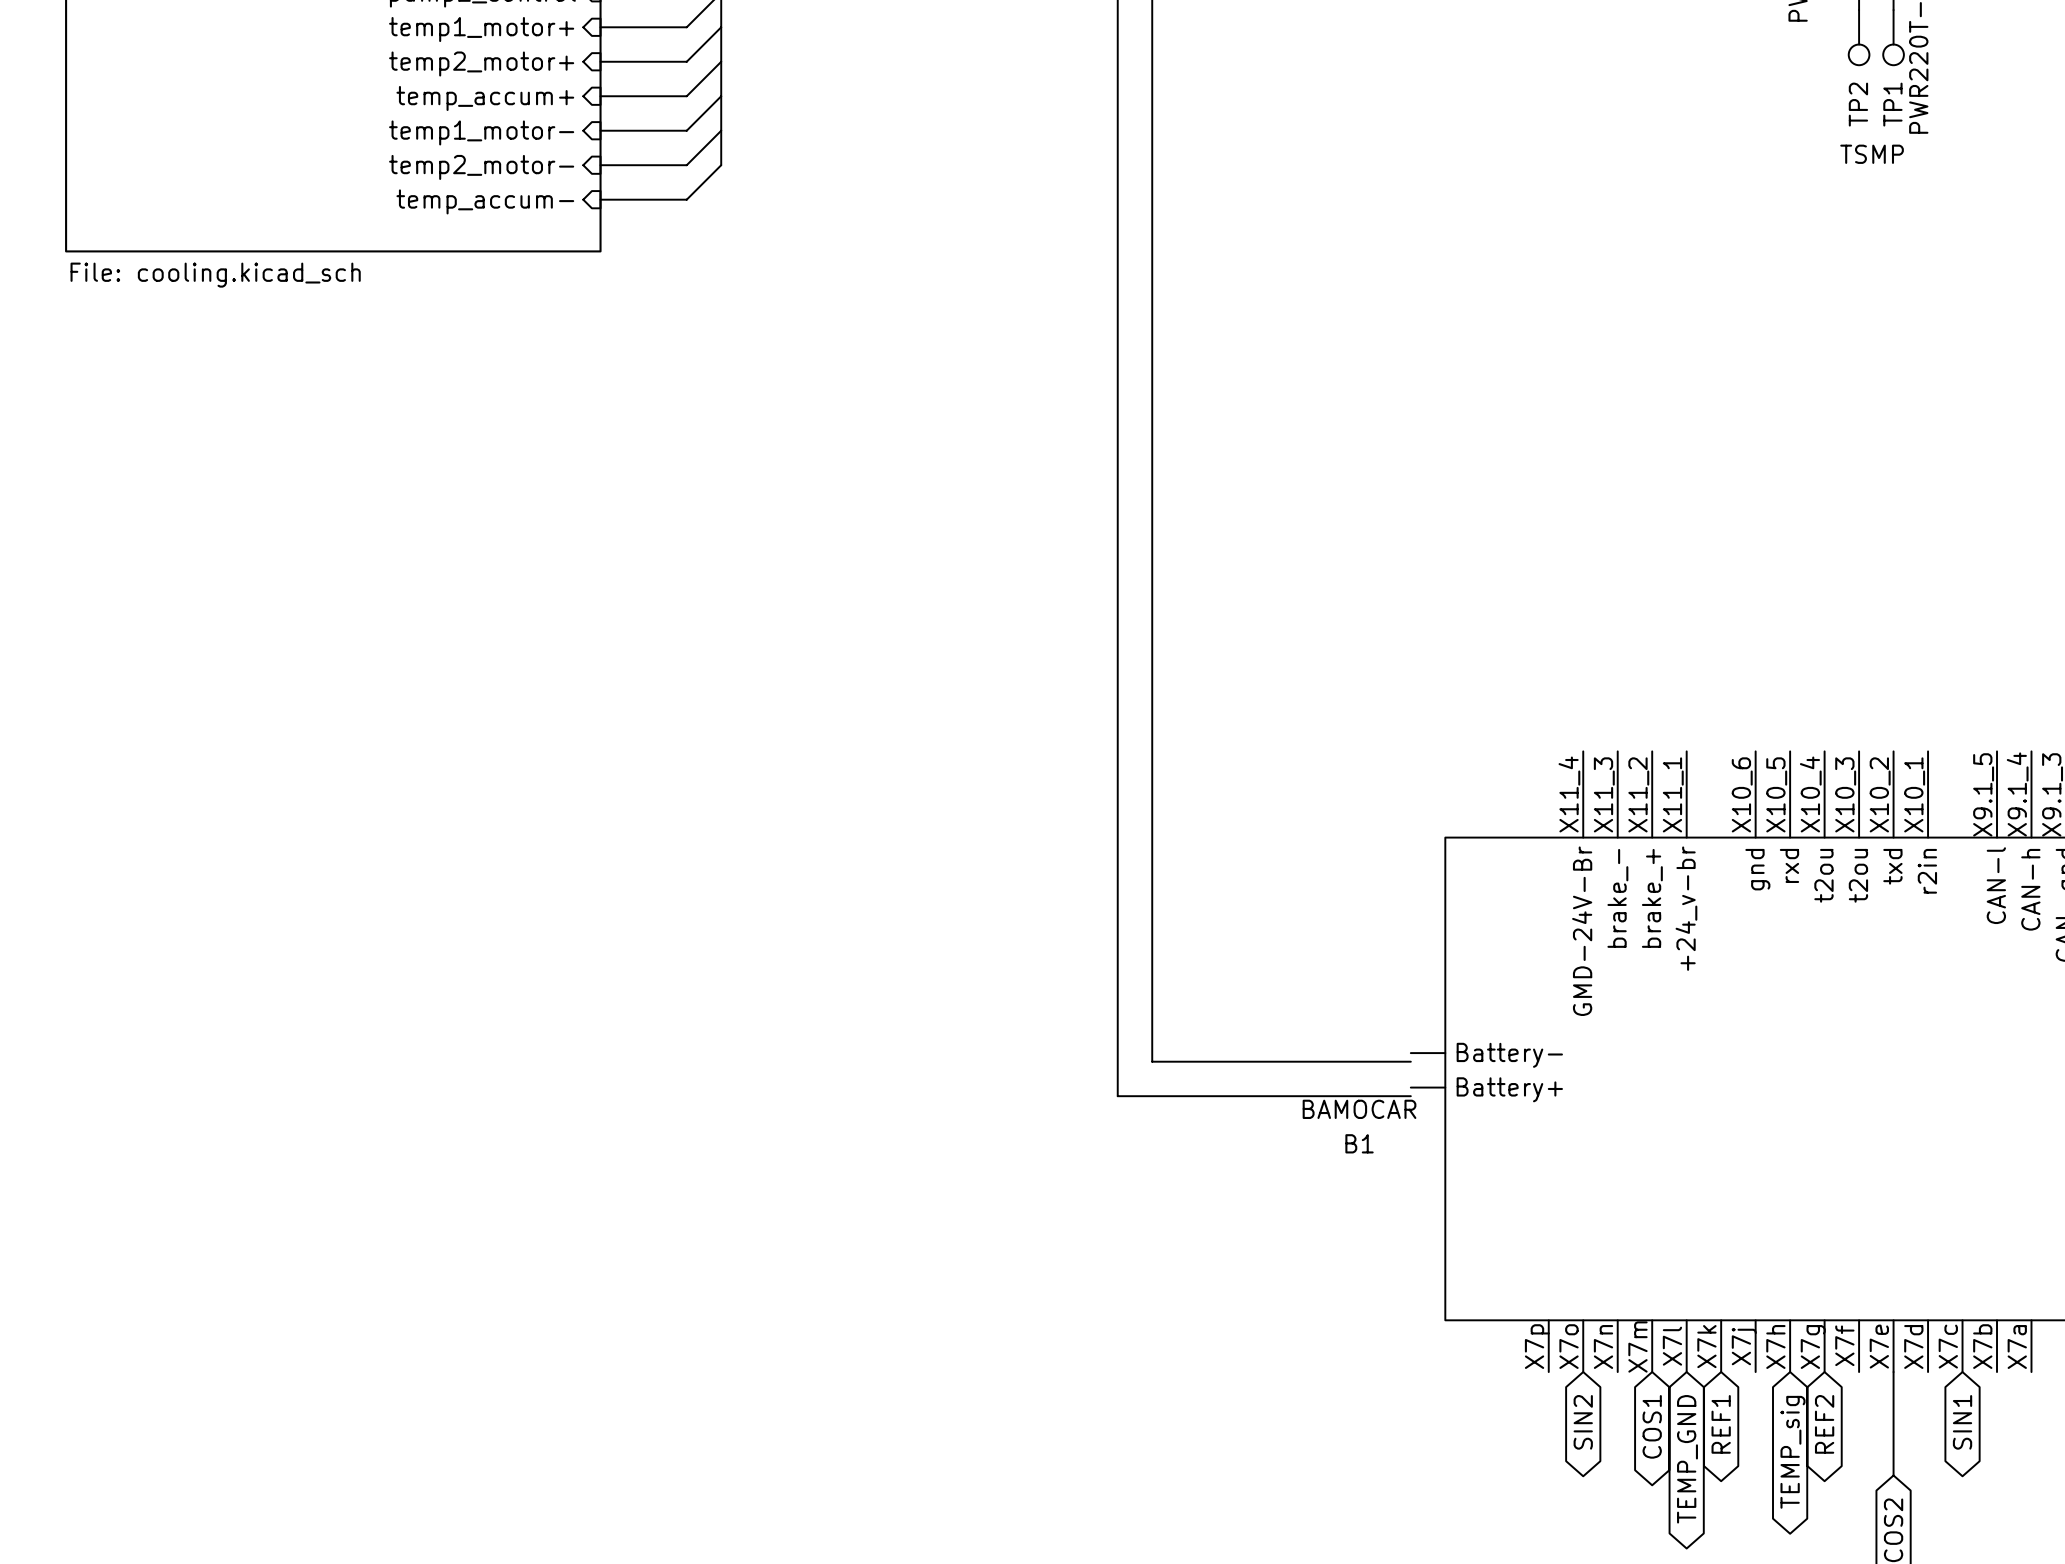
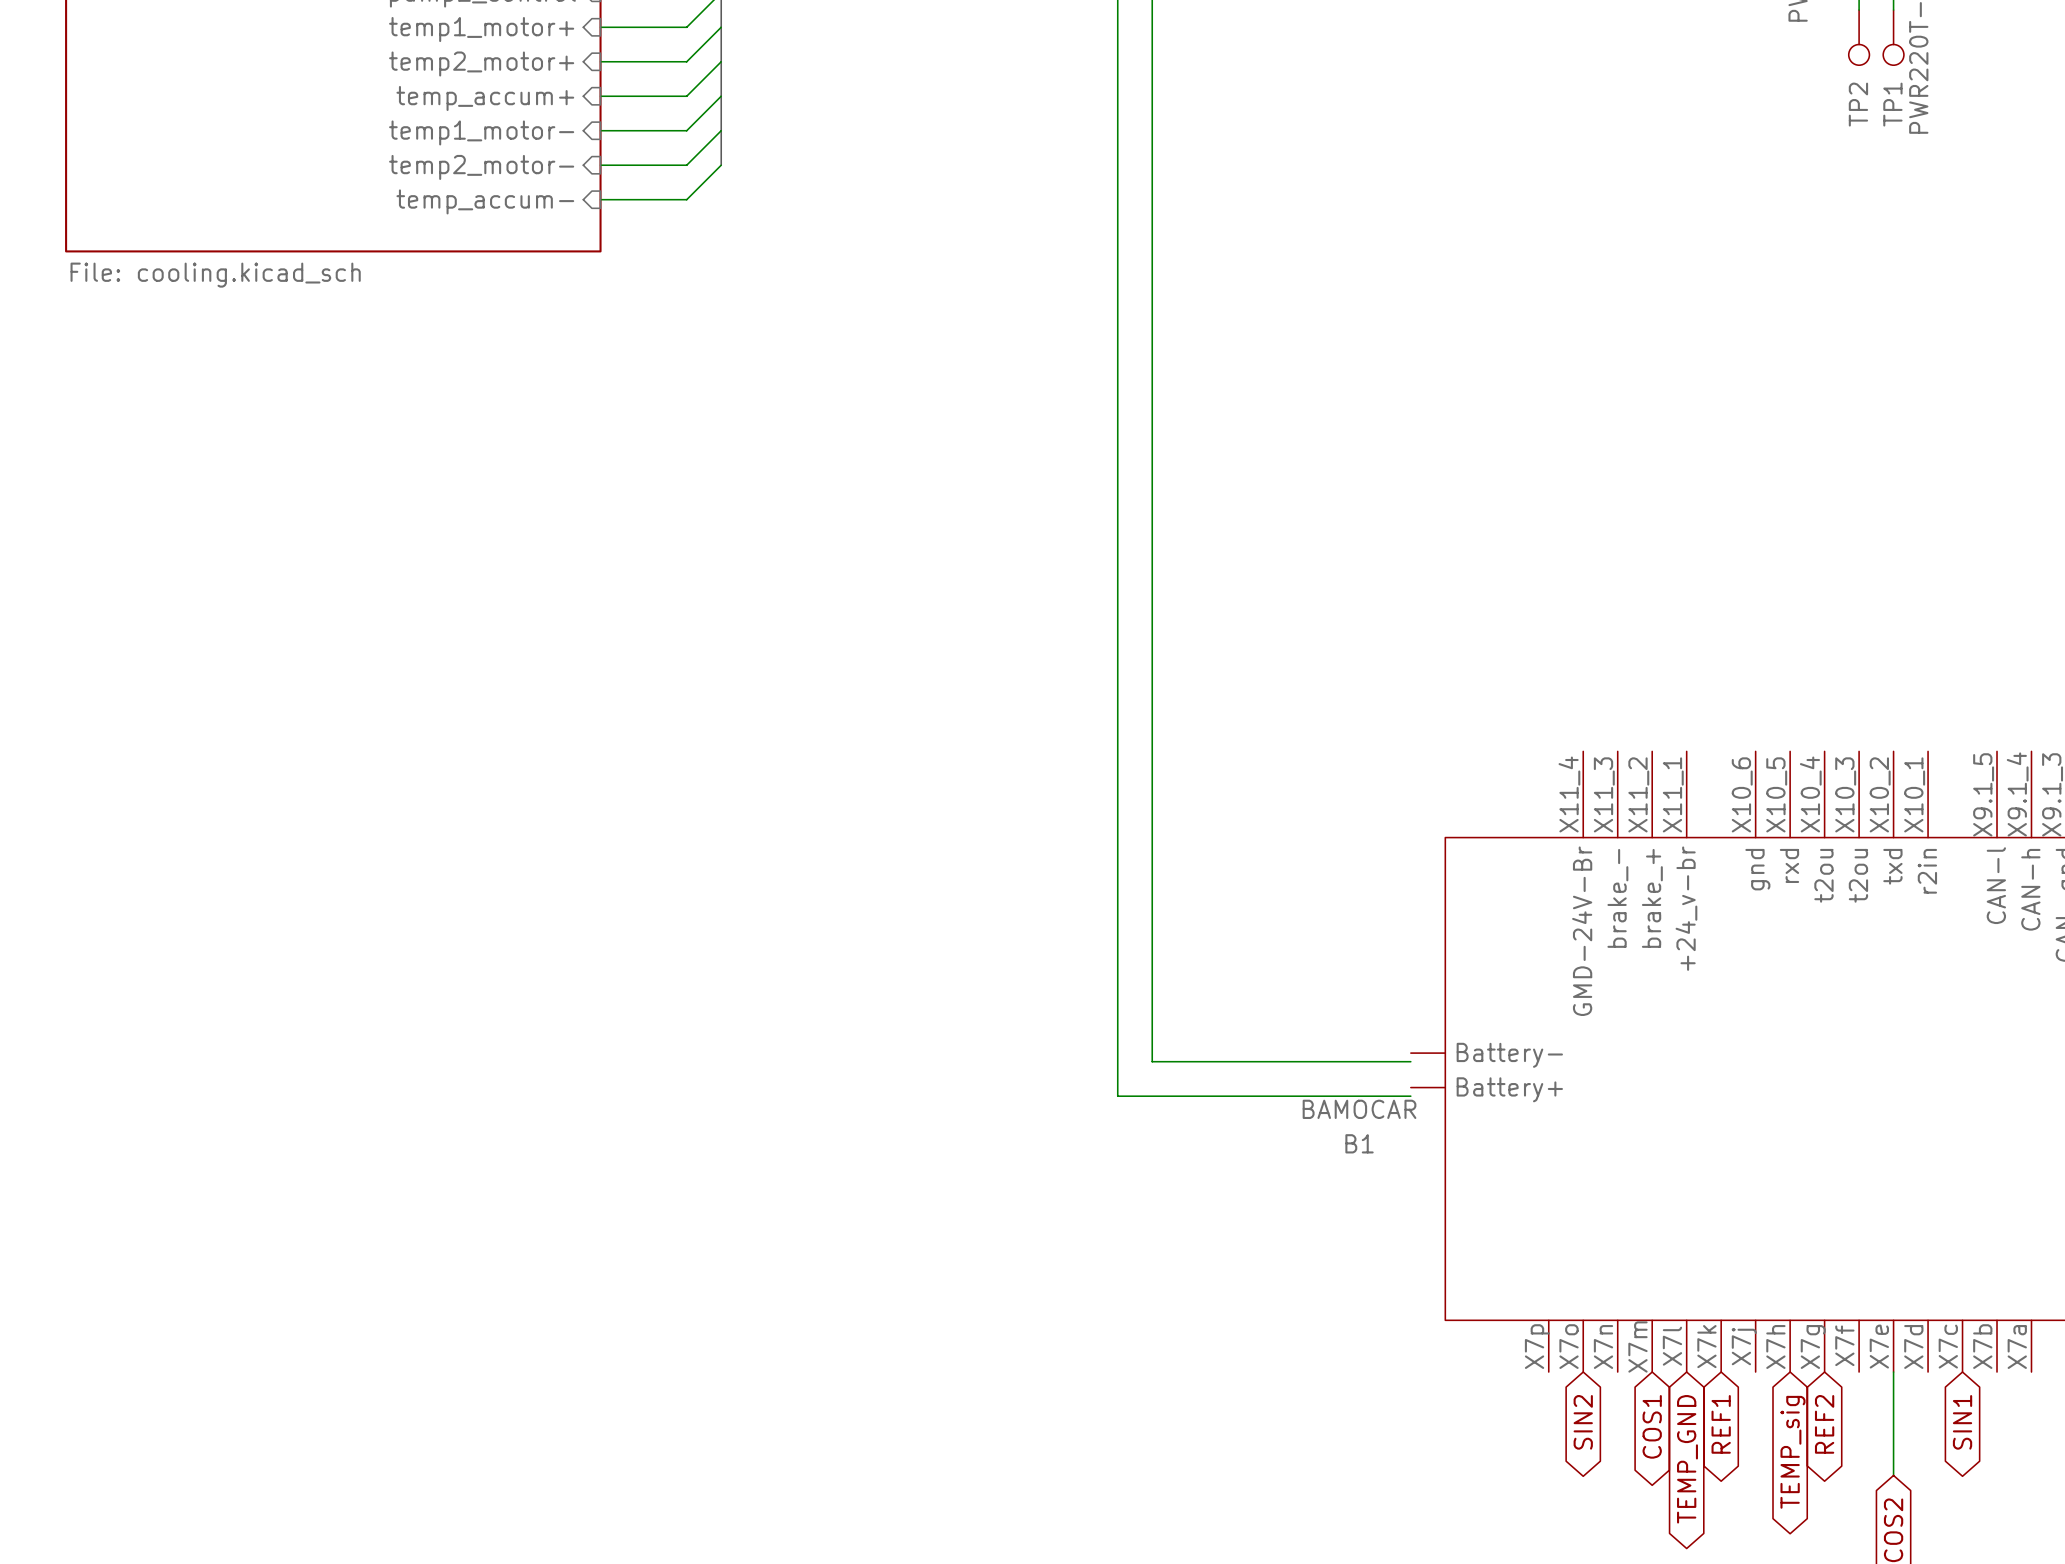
text: TSMP (1872, 154) -> none

